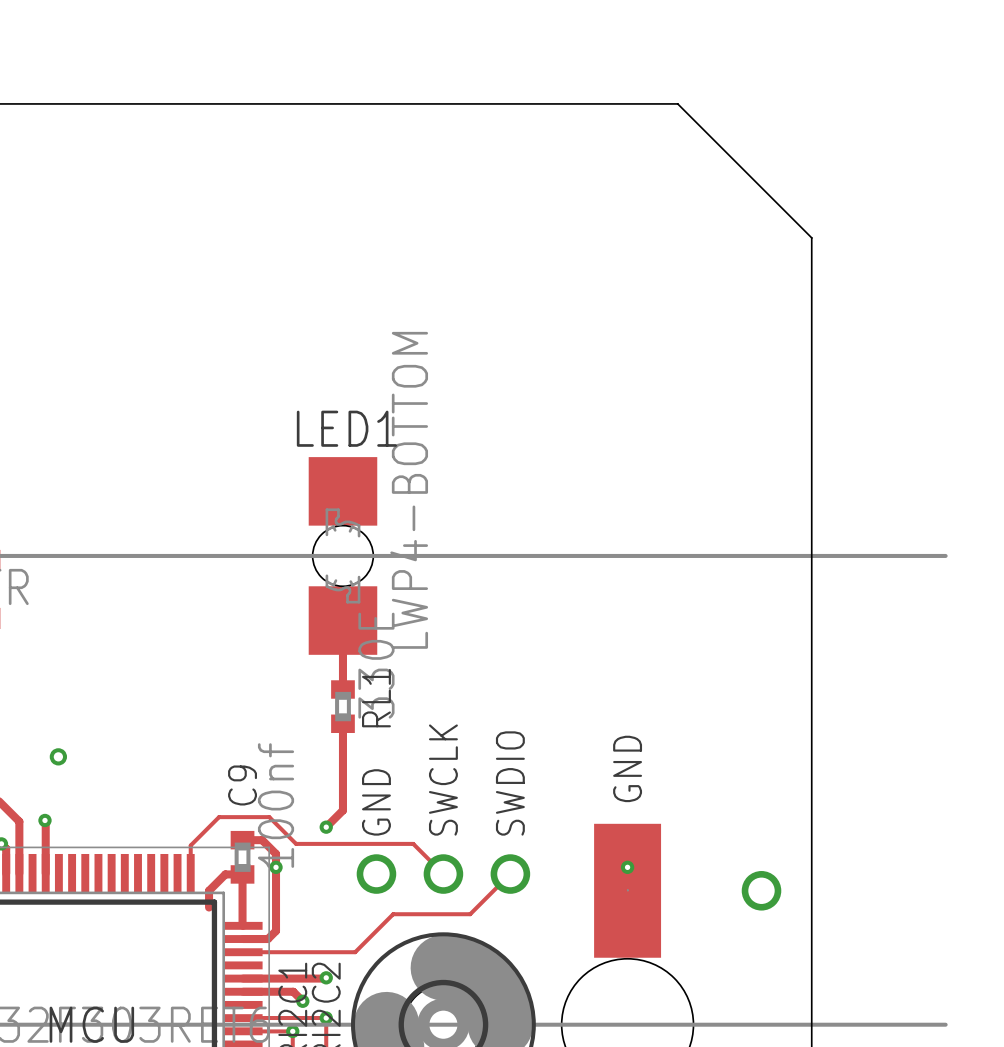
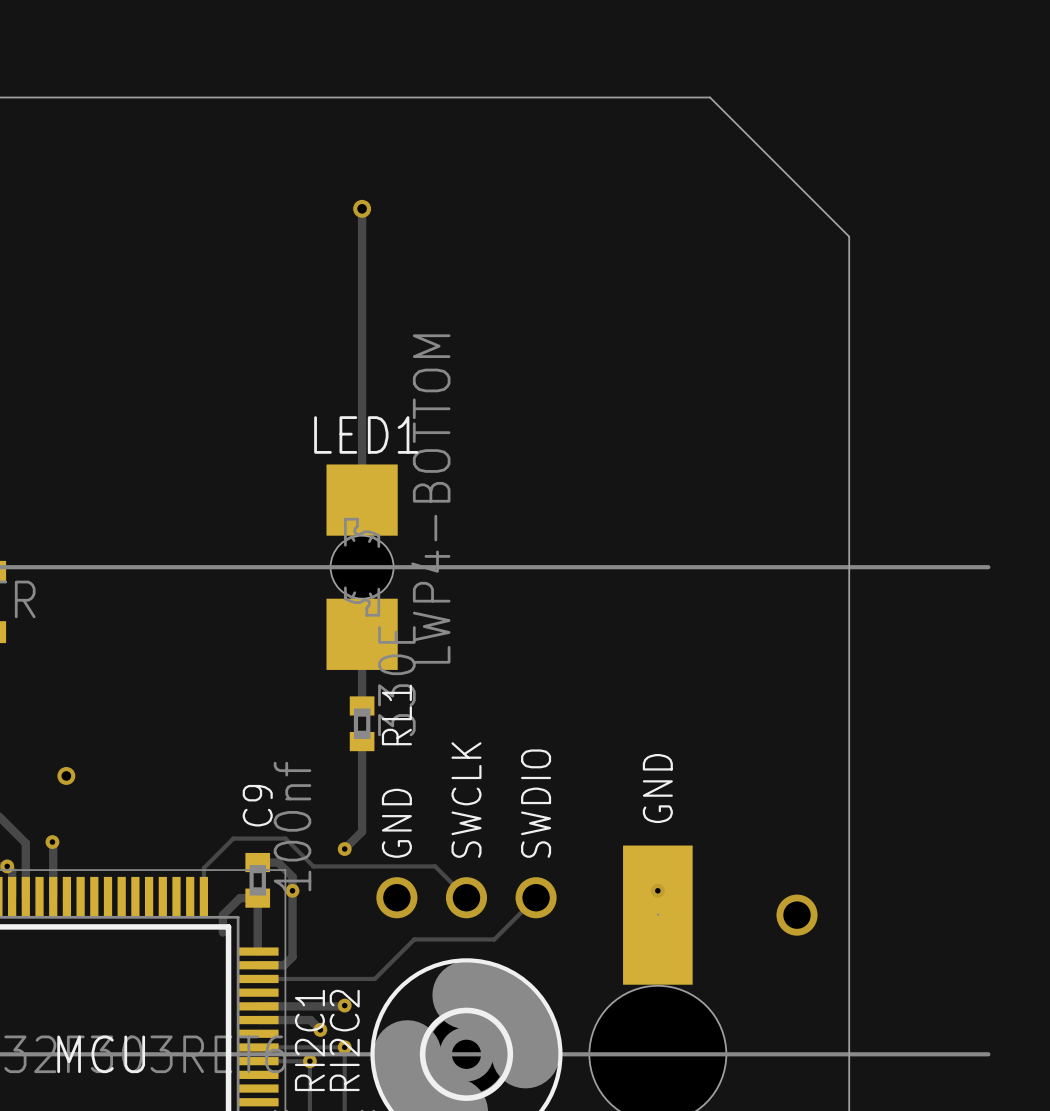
track: none -> (362, 208) (362, 500)
via: none -> (362, 208)

